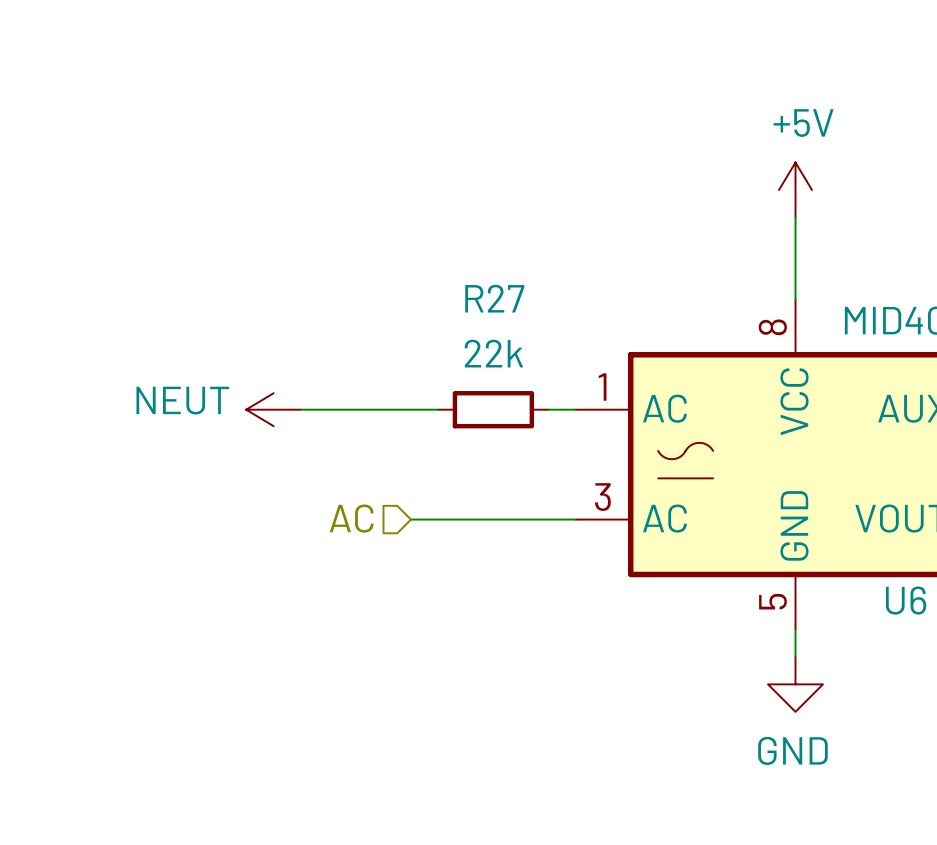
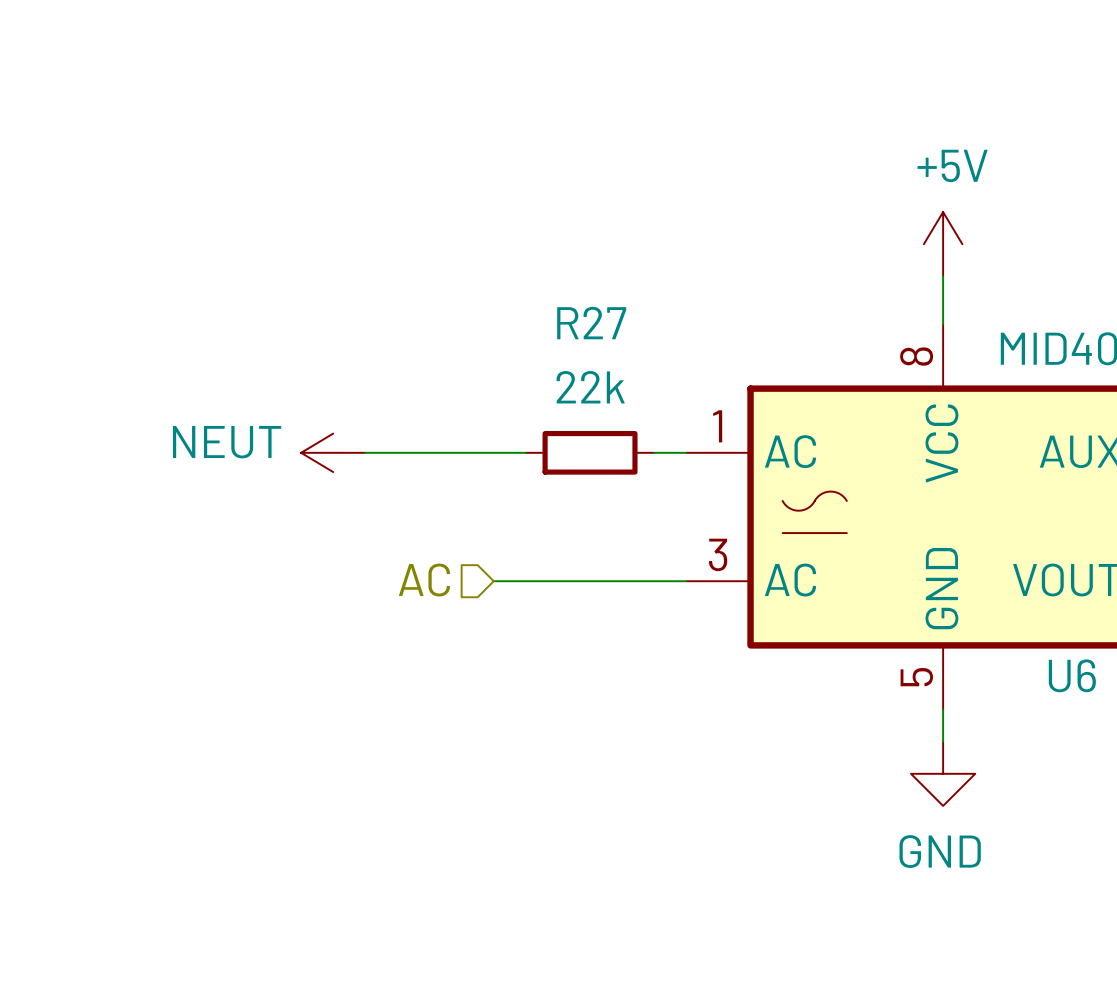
power symbol position: +5V (795, 189) -> +5V (943, 244)

